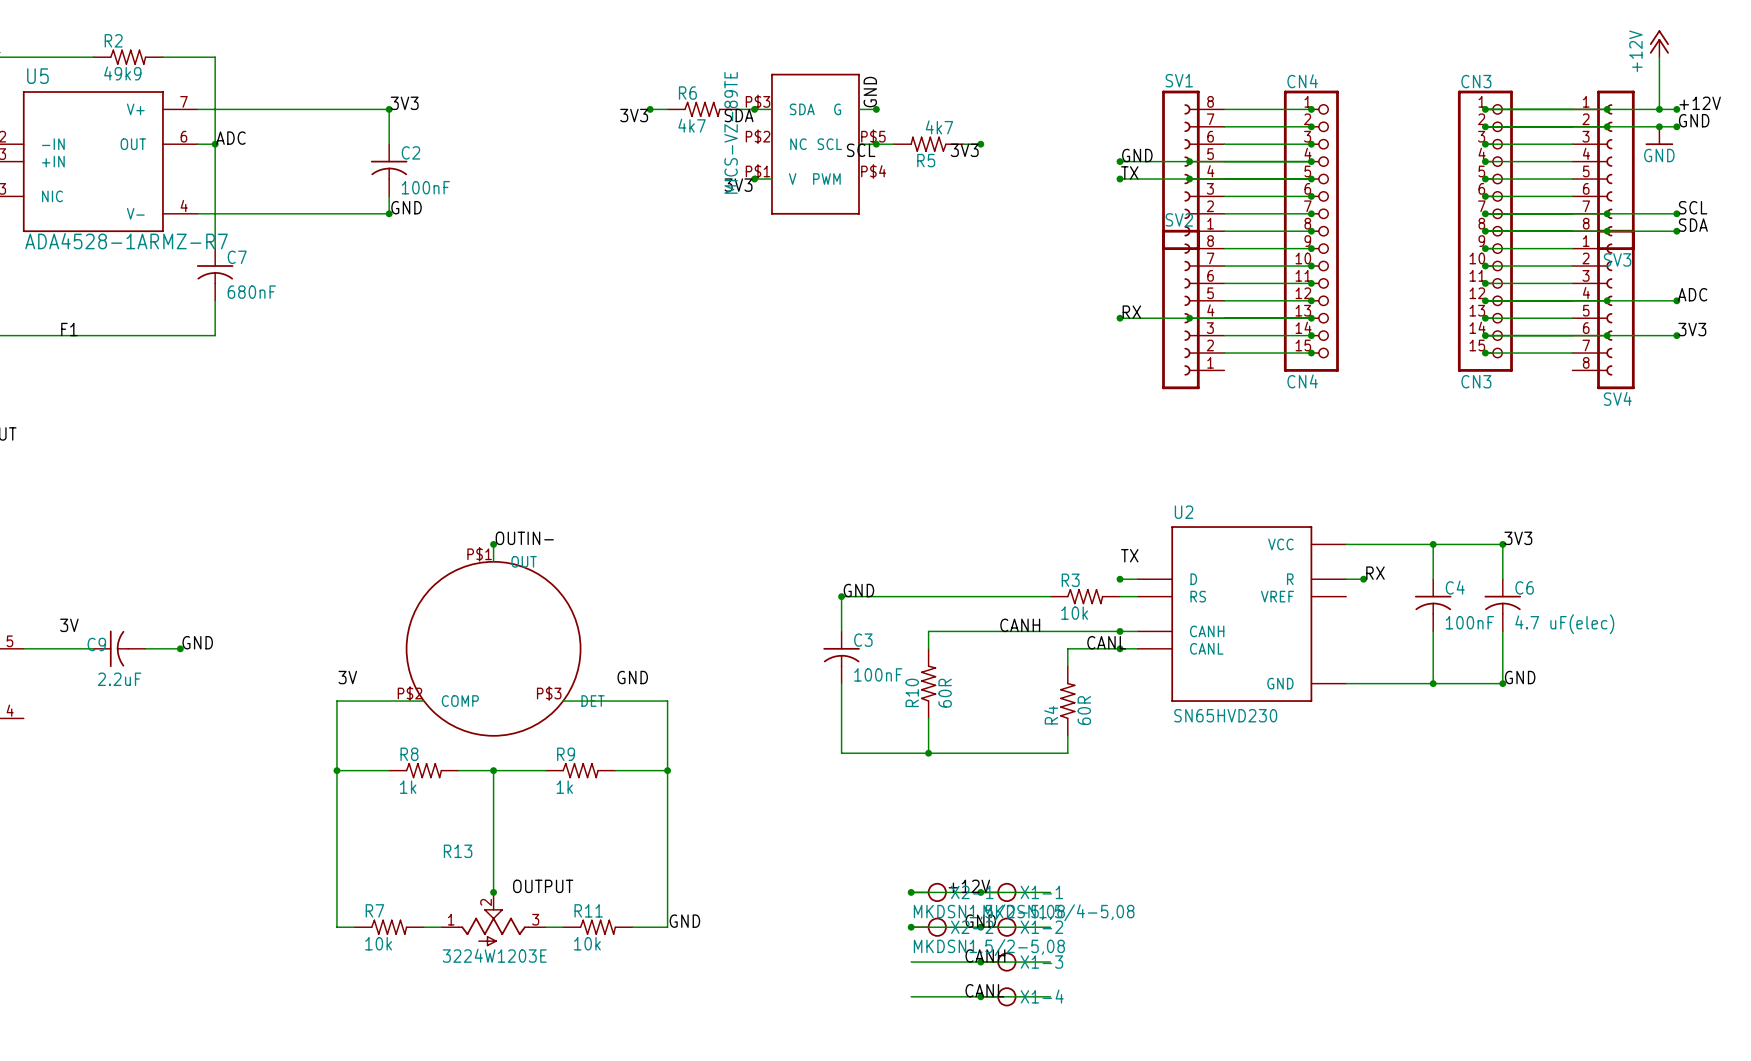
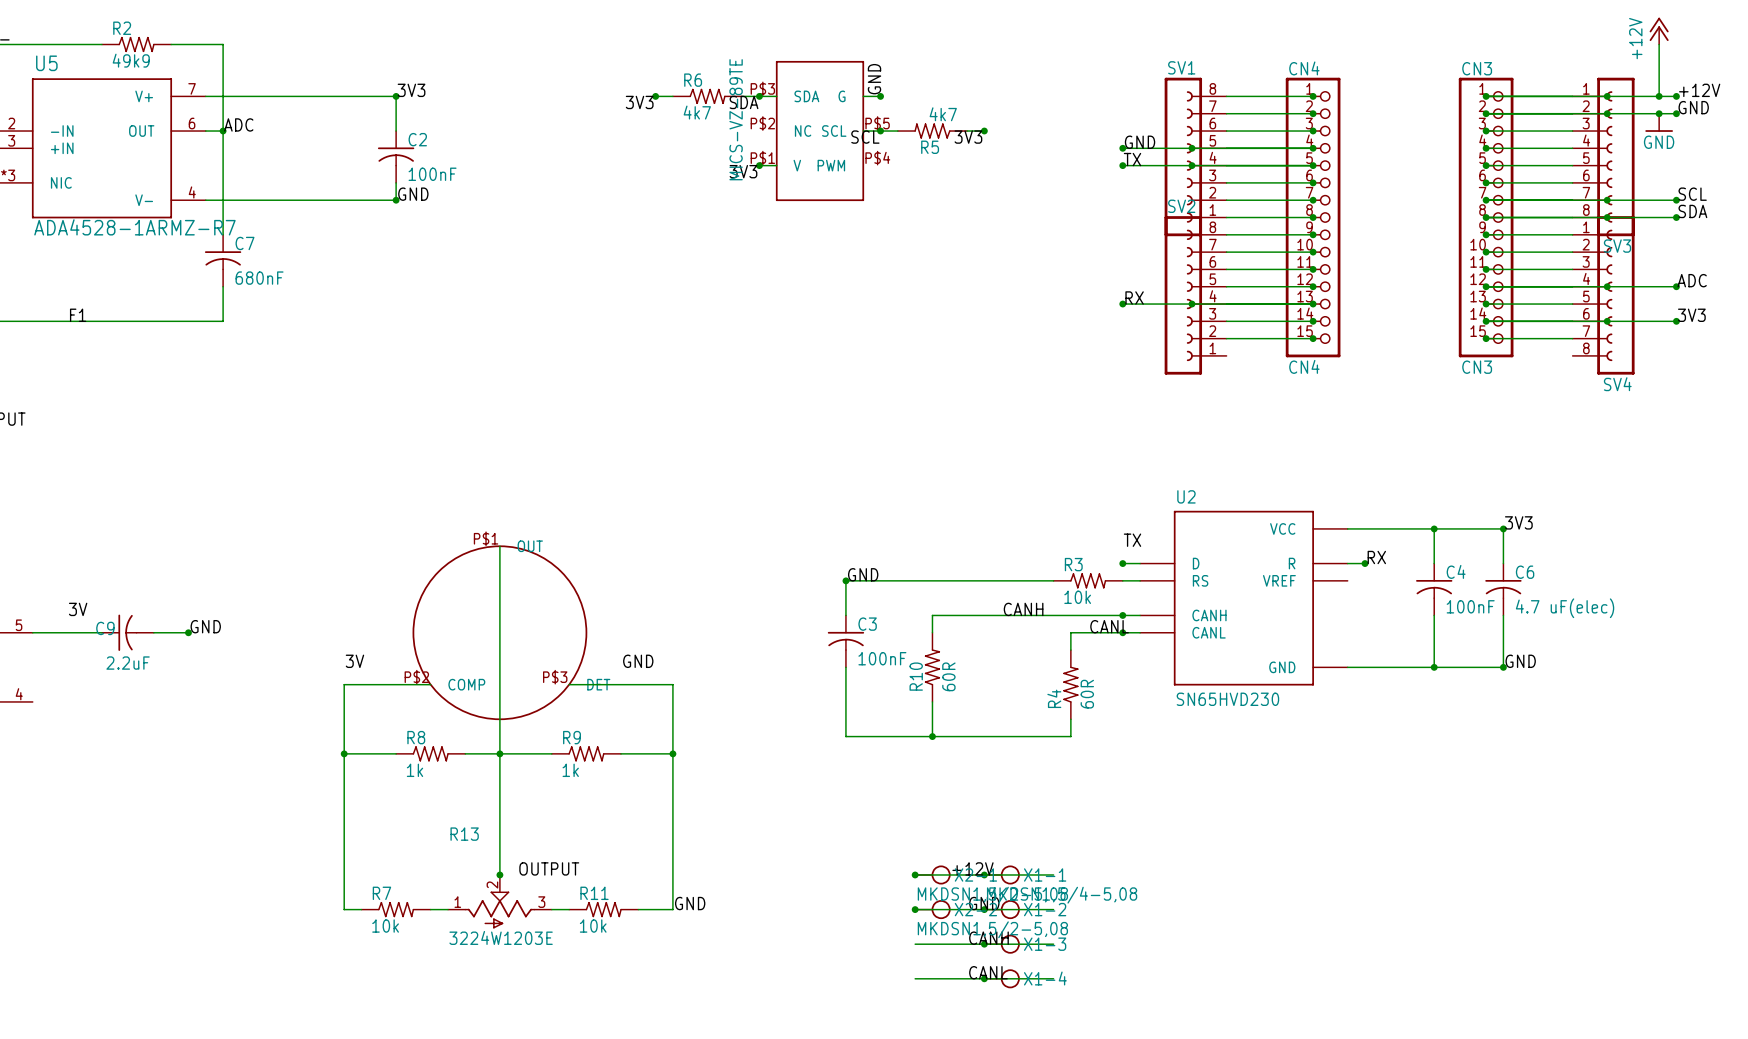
label: OUTIN- (524, 538) -> none
wire: (493, 544) (493, 561) -> (499, 753) (499, 546)
junction: (493, 544) -> none

